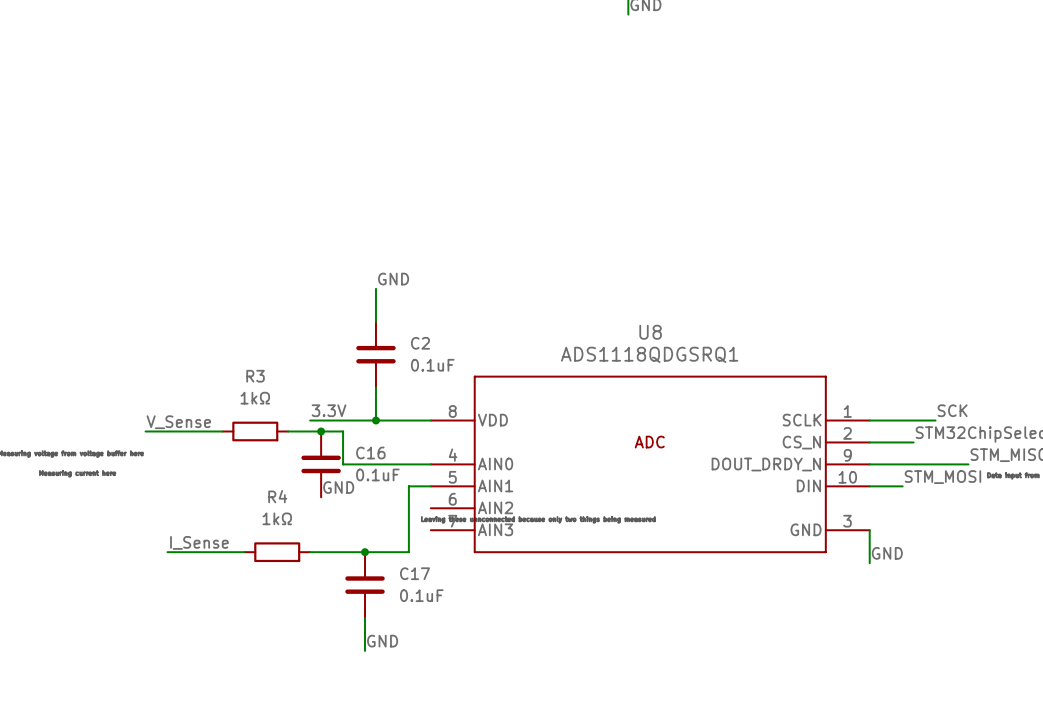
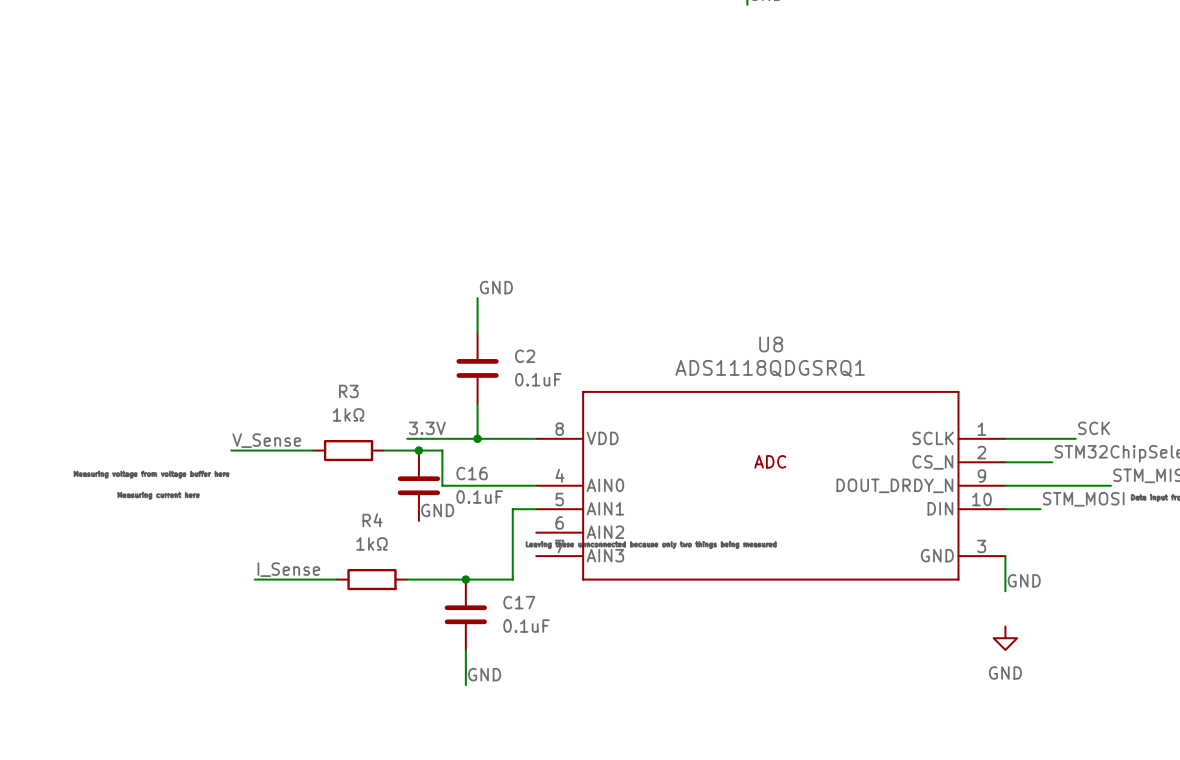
power symbol: none -> GND (1005, 638)

